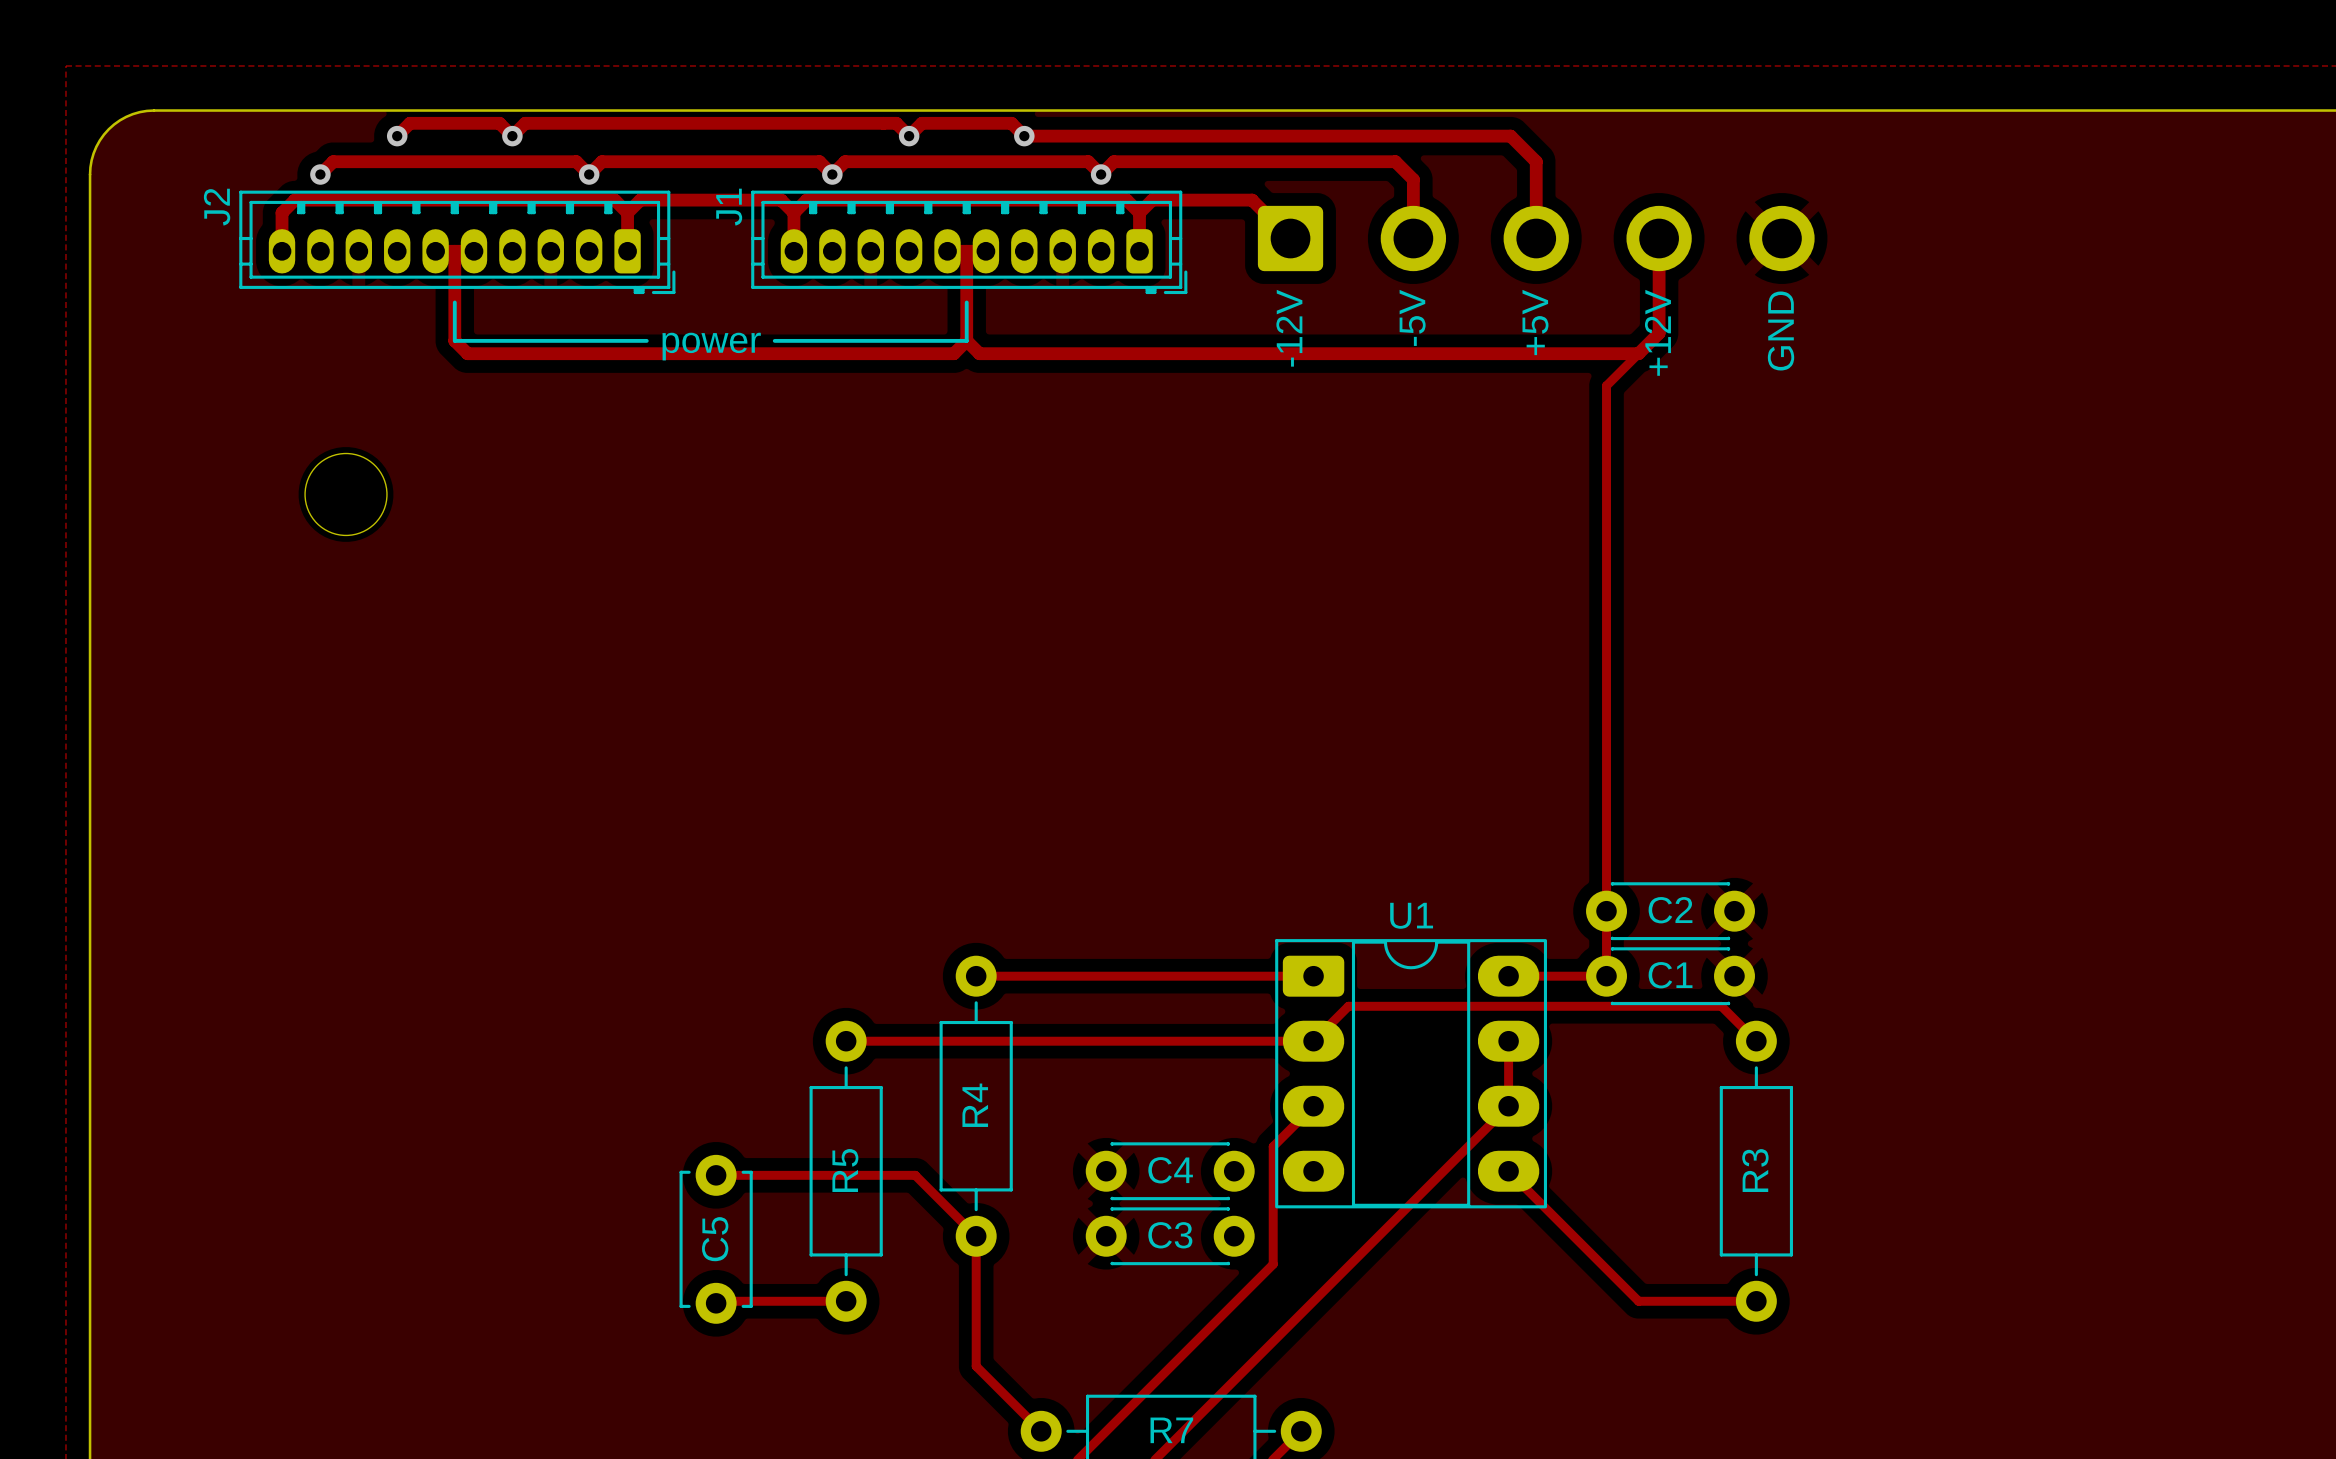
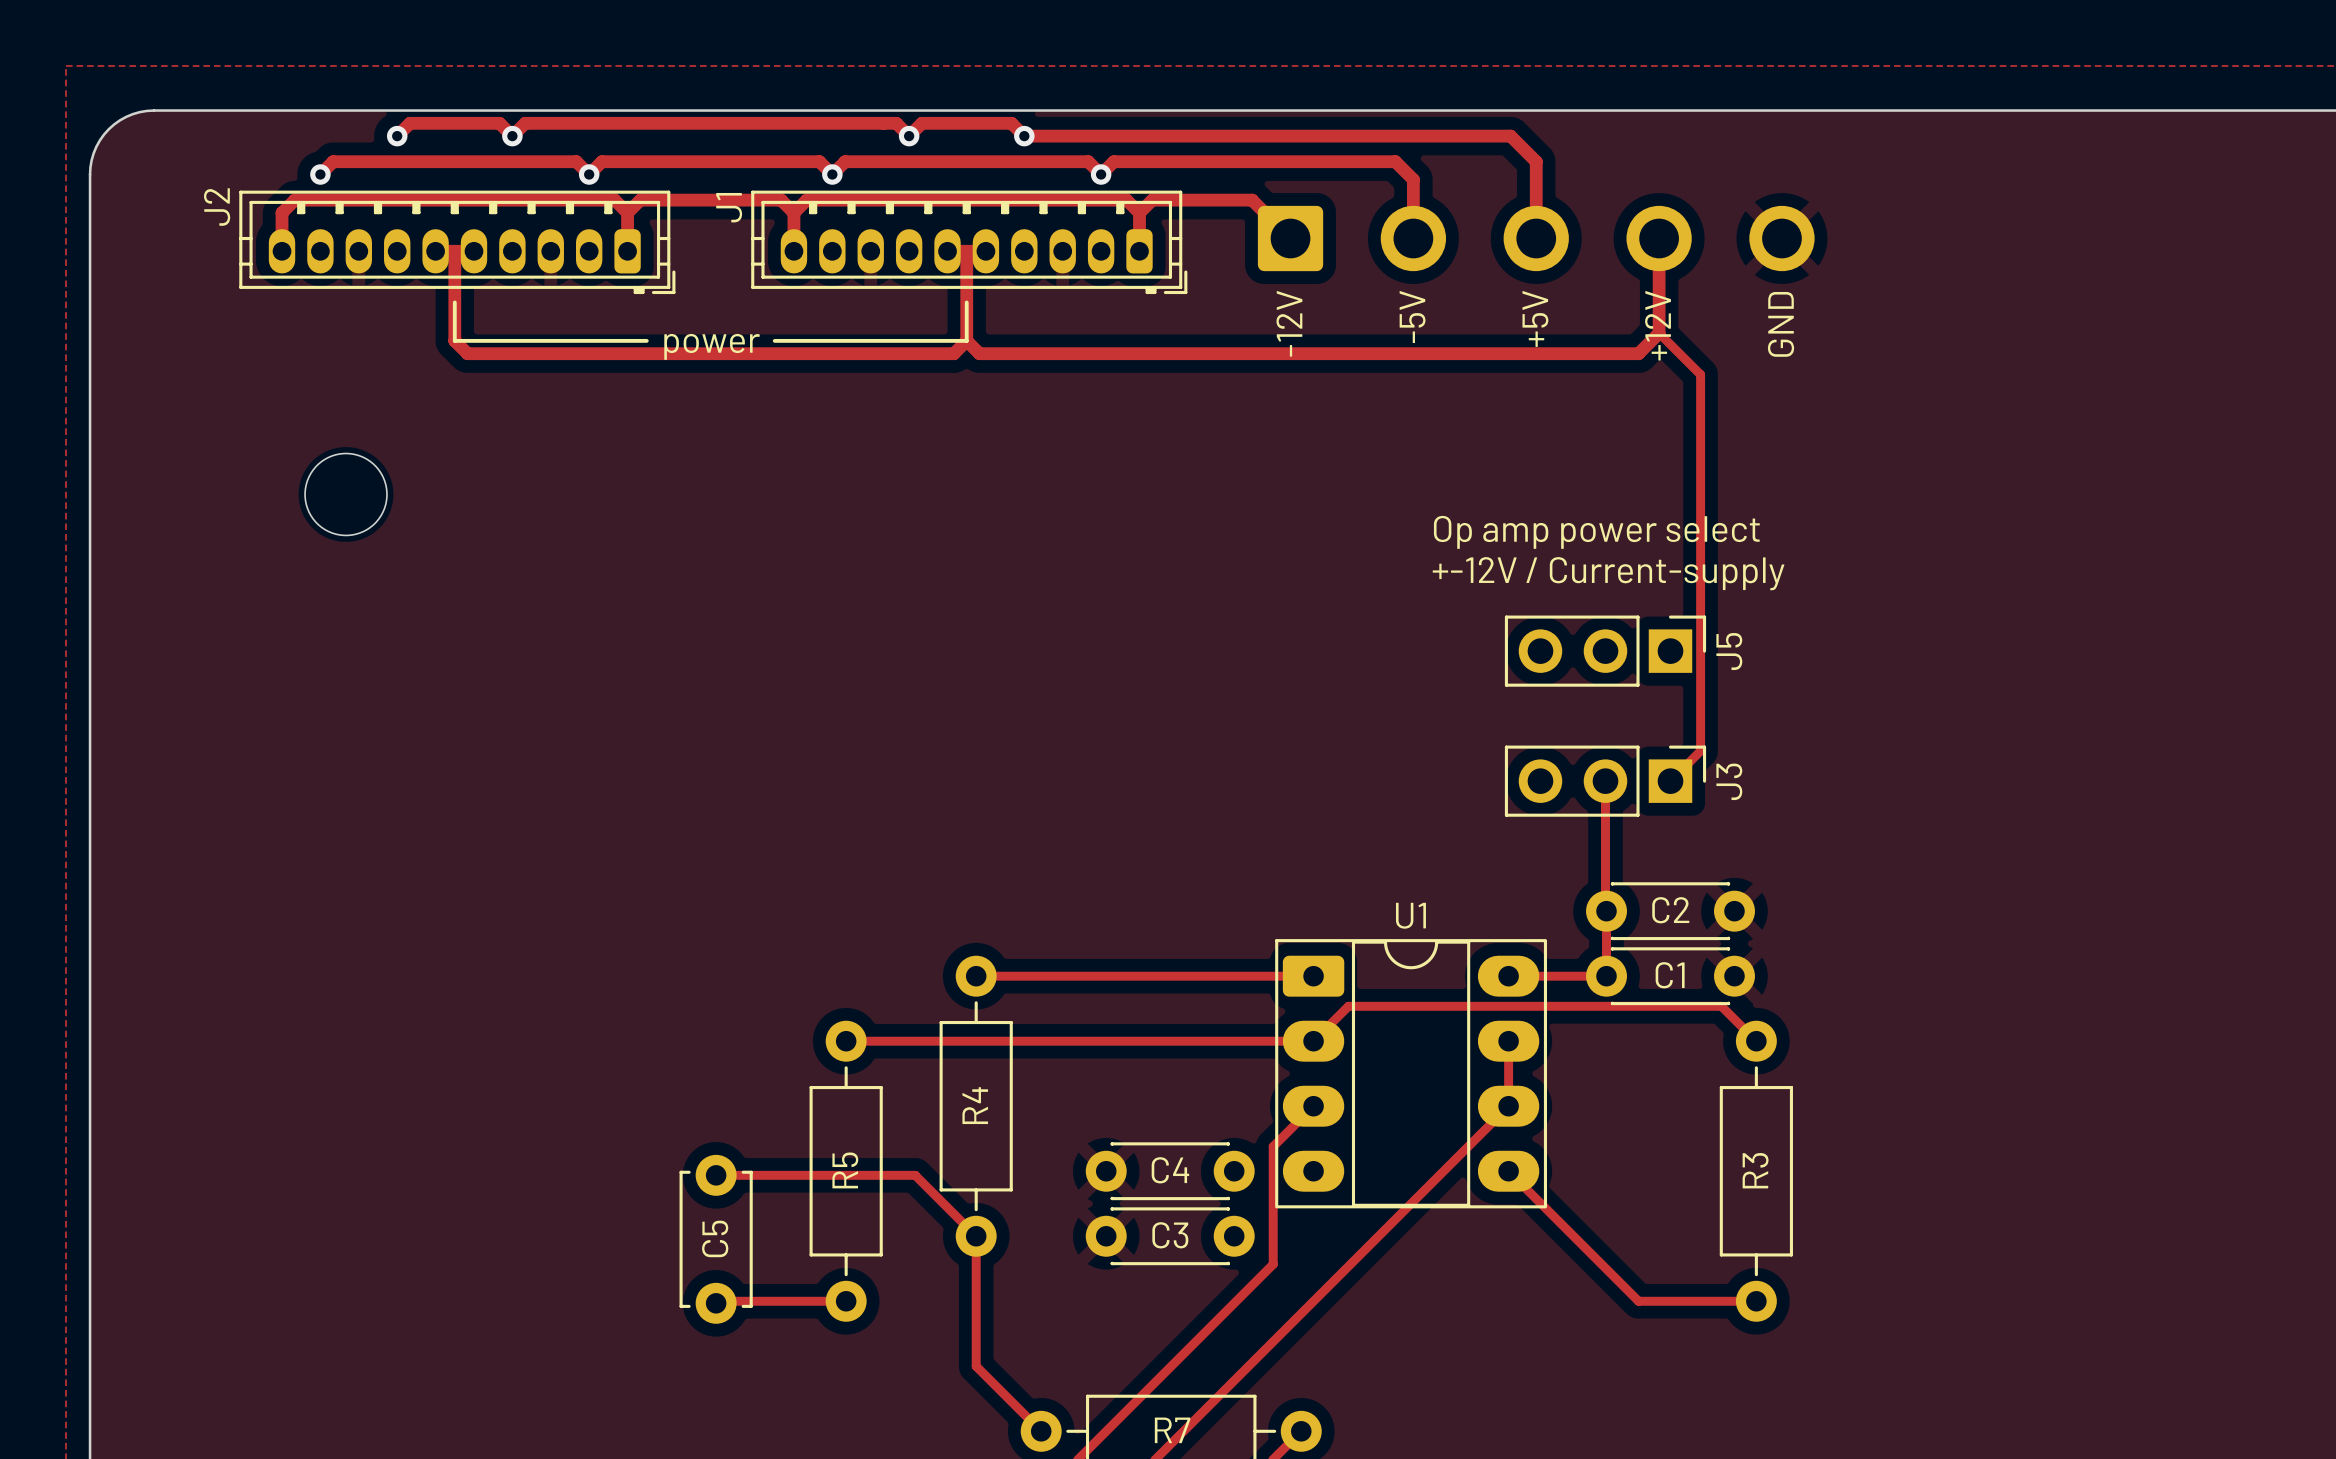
track: none -> (1659, 333) (1700, 374) (1700, 751) (1670, 781)
track: (1638, 353) (1606, 385) (1606, 911) -> (1605, 781) (1606, 911)
text: none -> Op amp power select (1596, 532)
text: none -> +-12V / Current-supply (1608, 573)
J5: none -> (1605, 651)
J3: none -> (1605, 781)

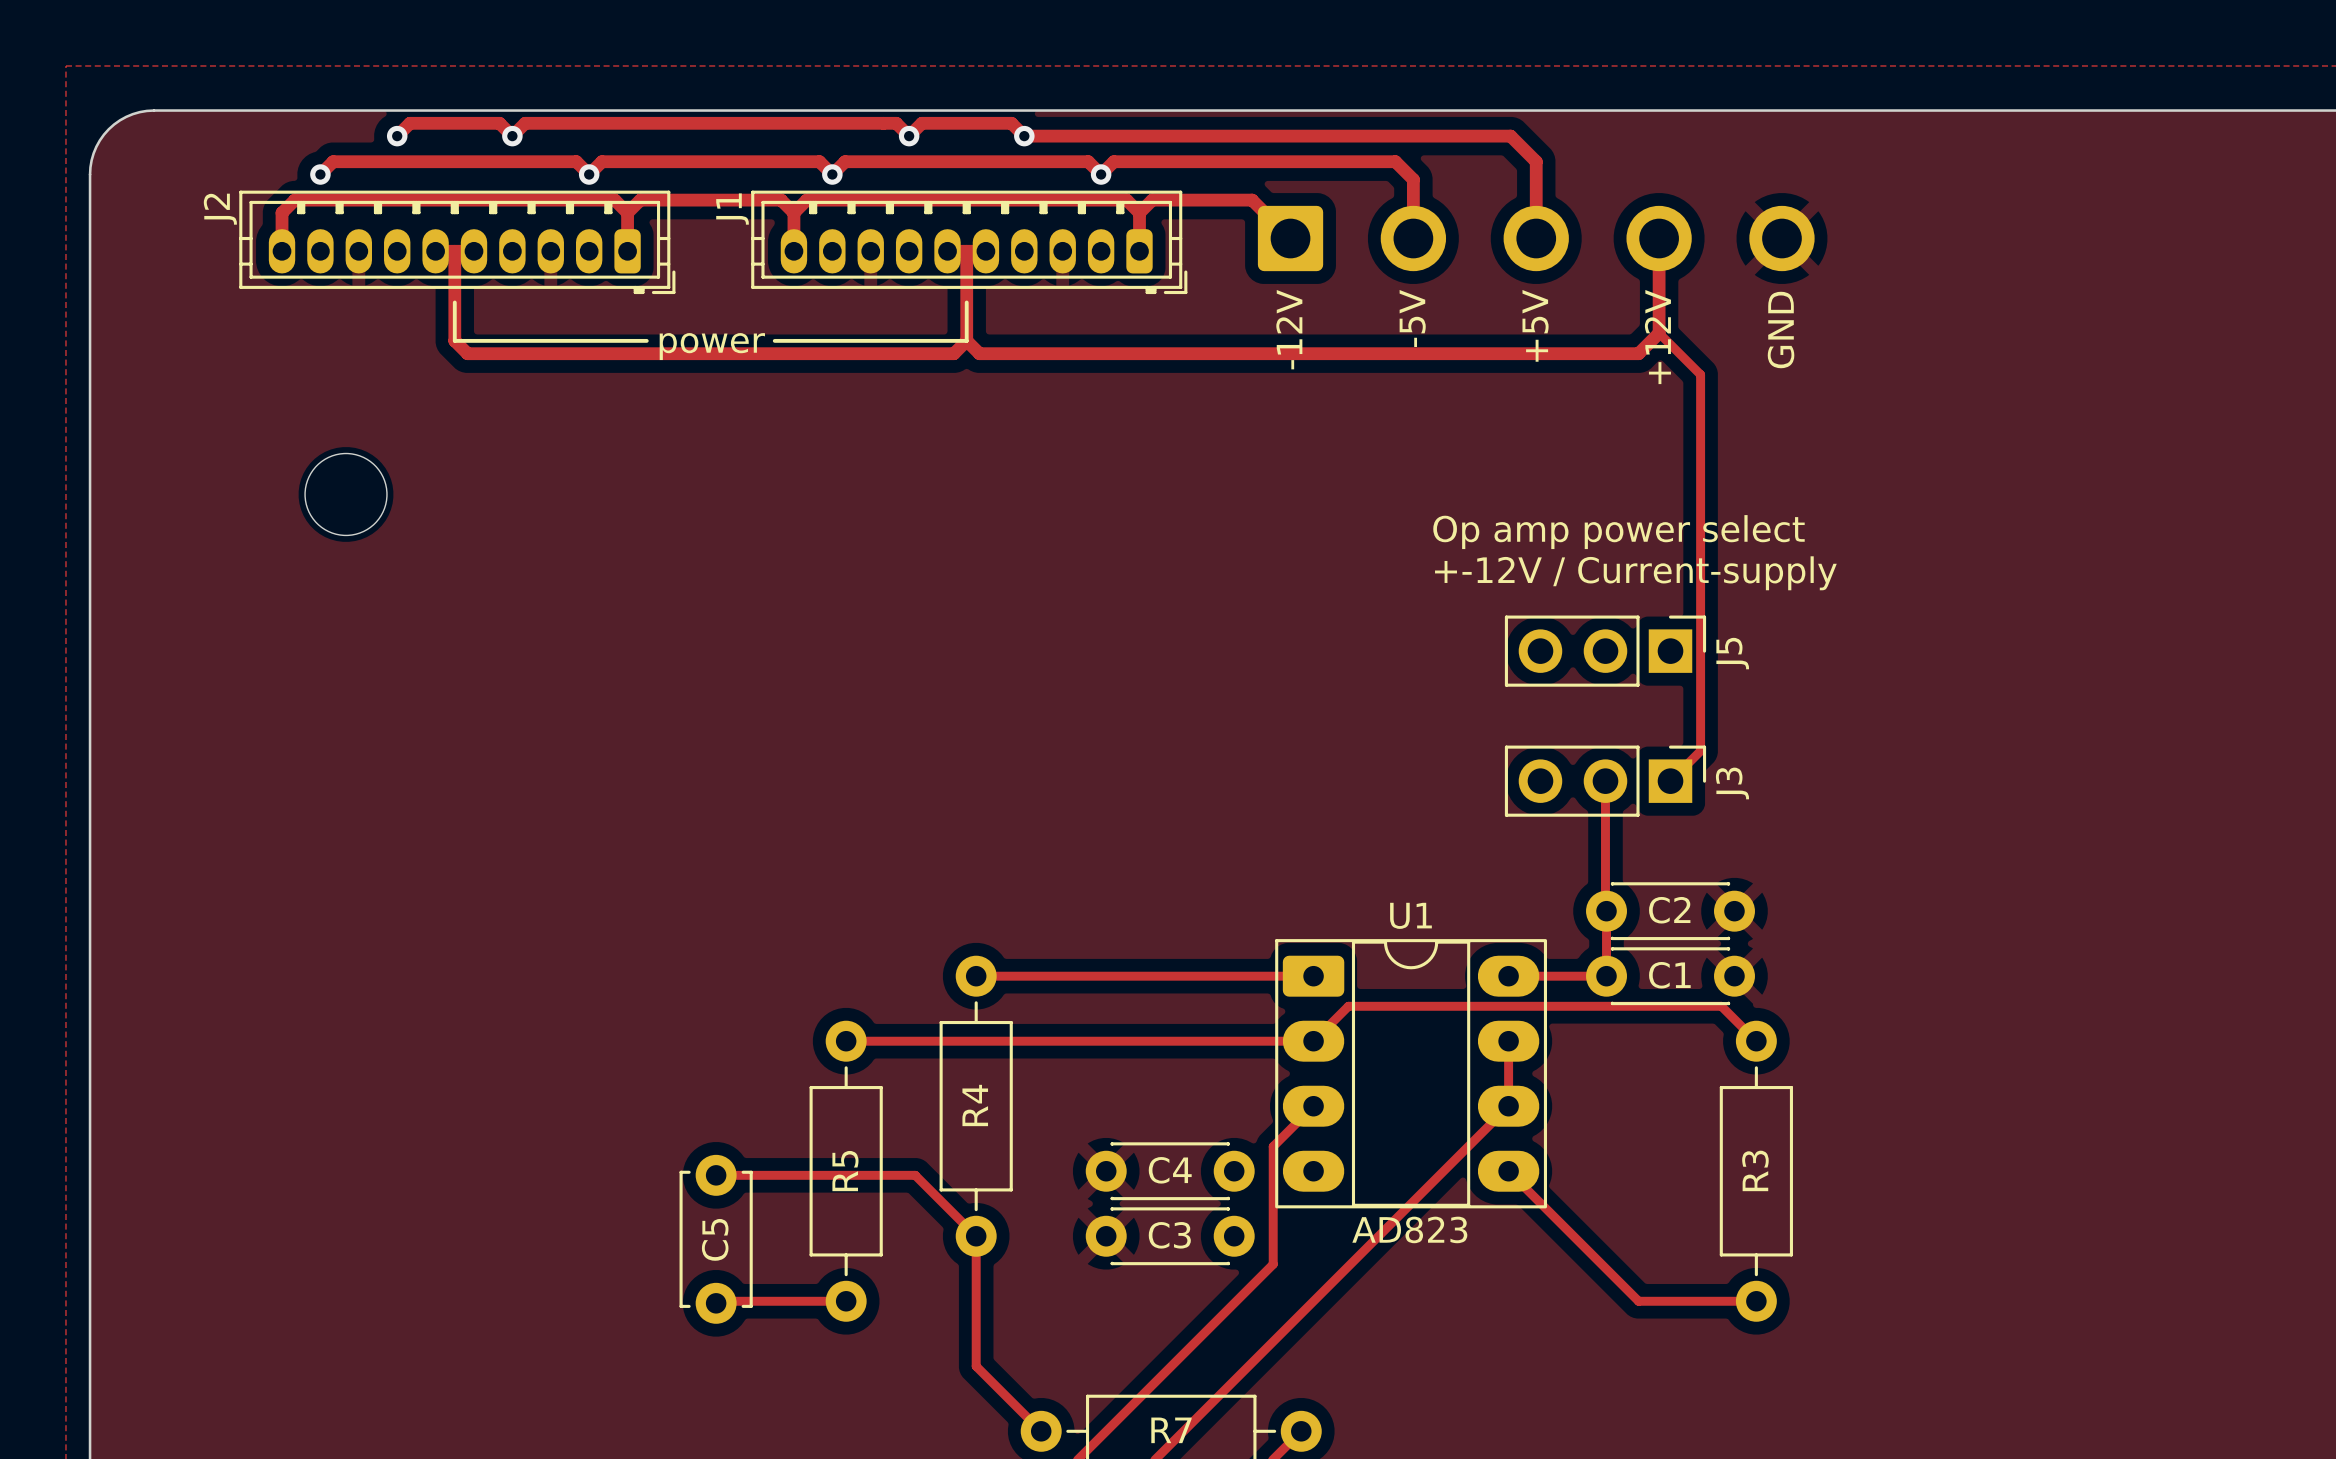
U1 value: none -> AD823 (1409, 1229)

